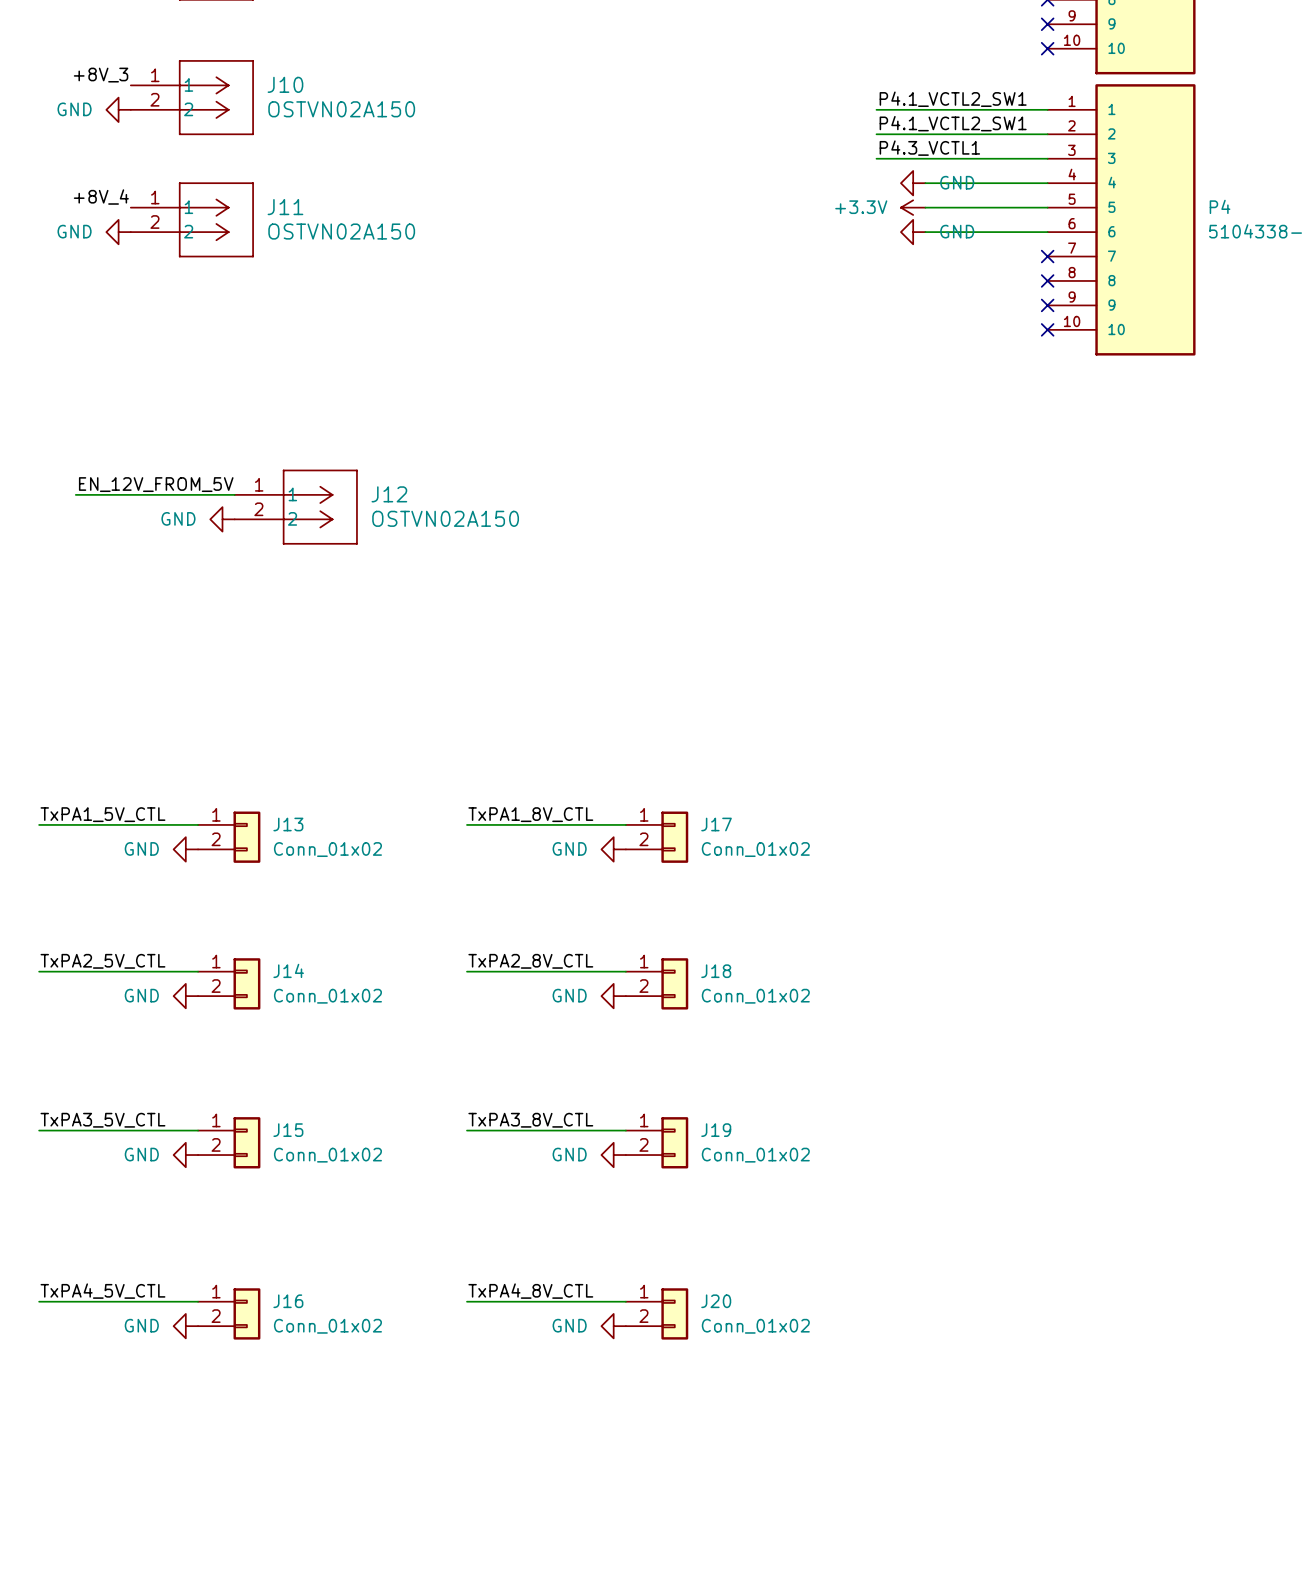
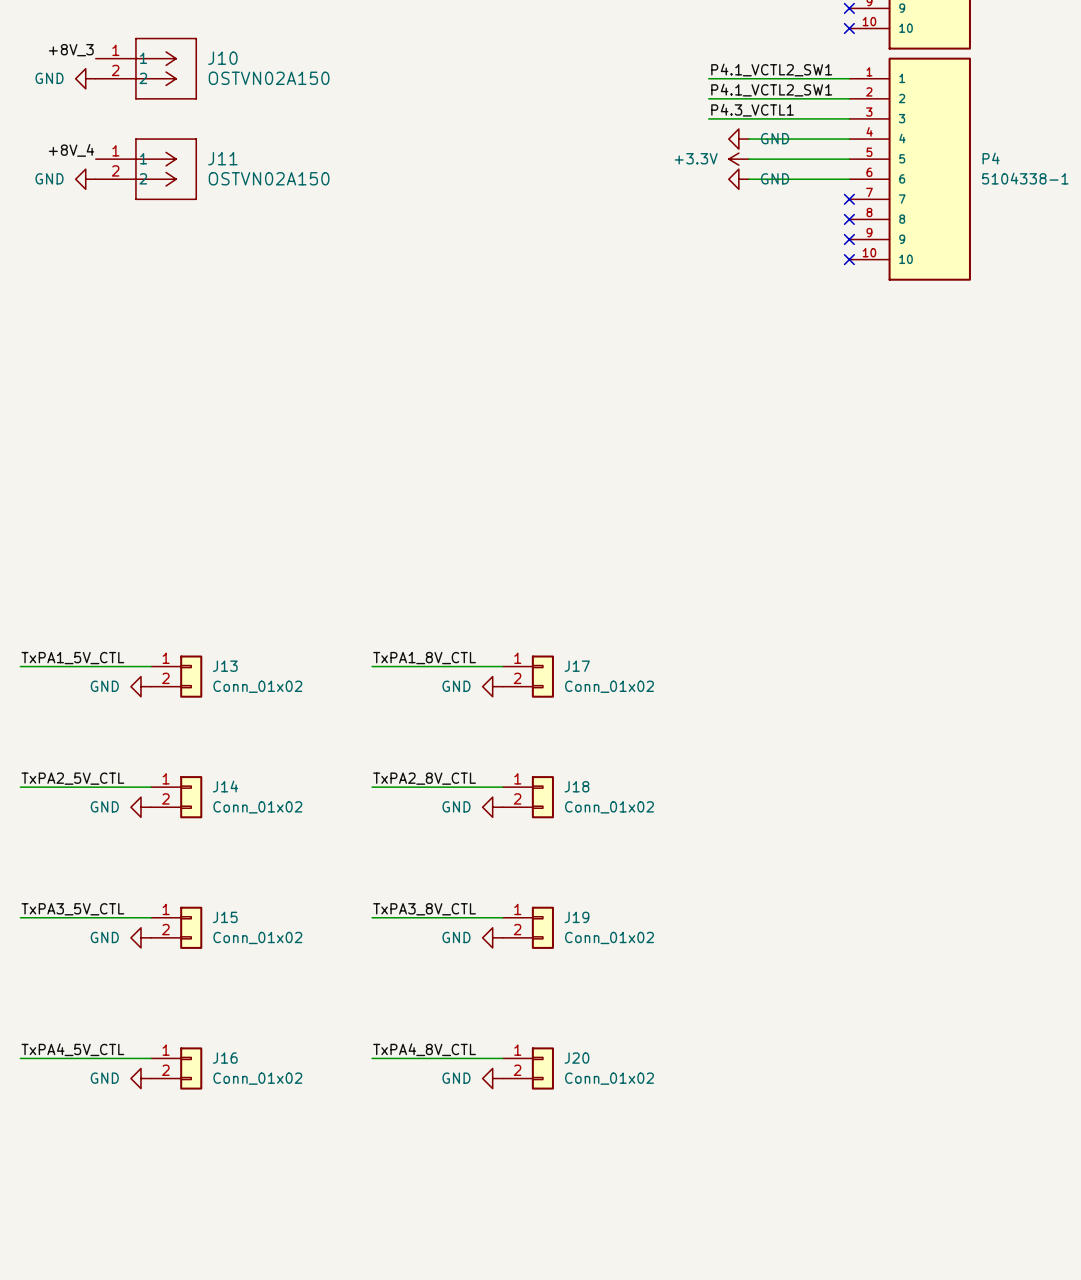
label: EN_12V_FROM_5V (156, 484) -> none
wire: (75, 494) (234, 494) -> none
J12: OSTVN02A150 (296, 507) -> none
power symbol: GND (222, 519) -> none

